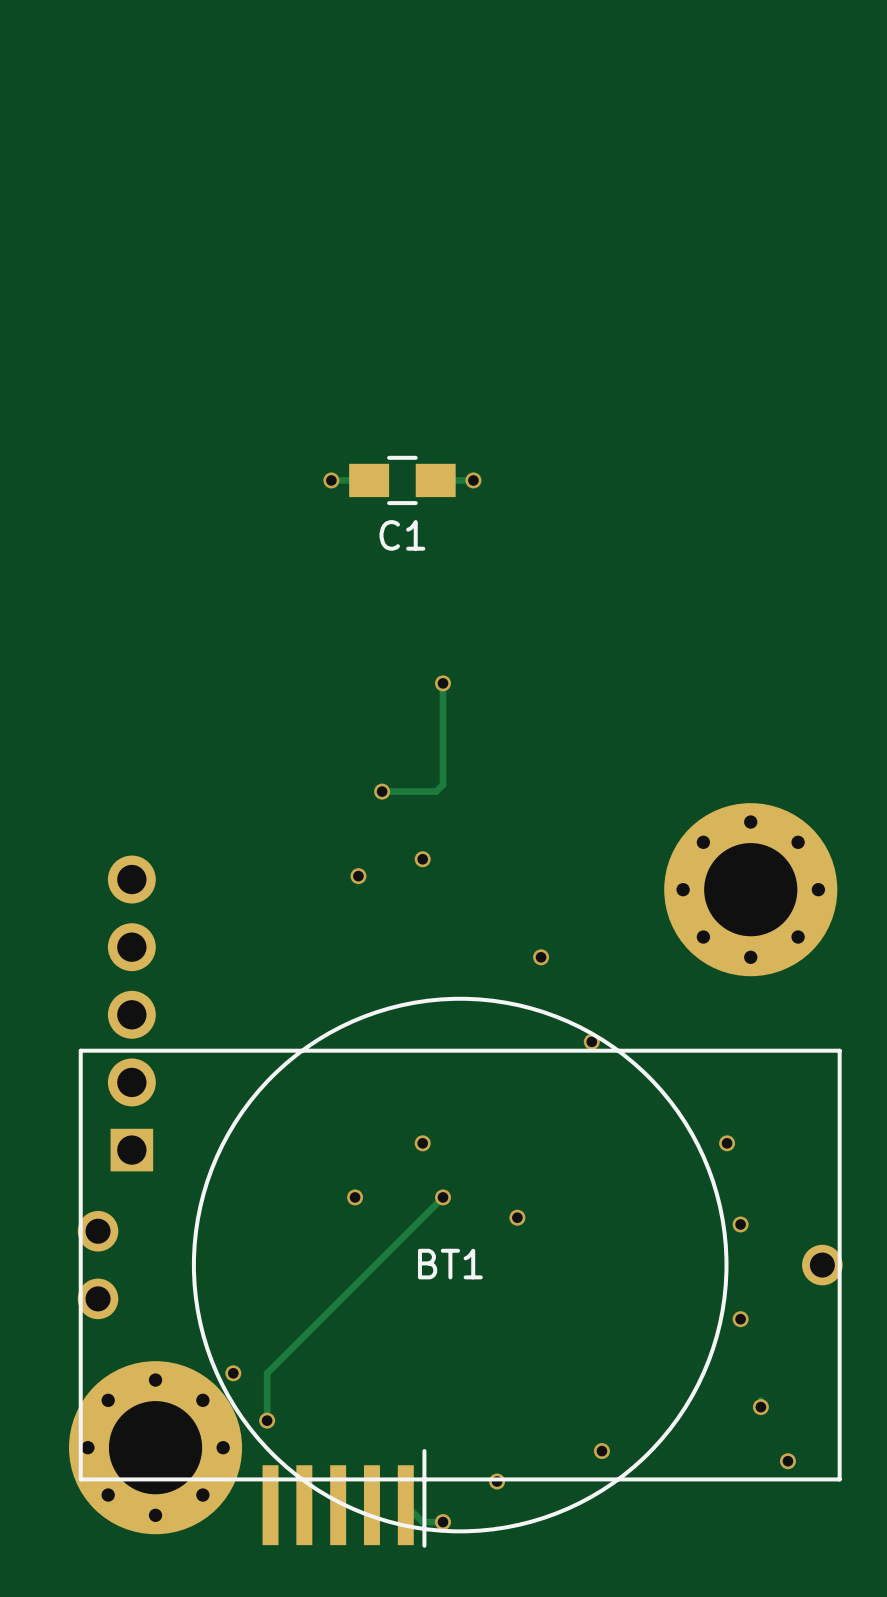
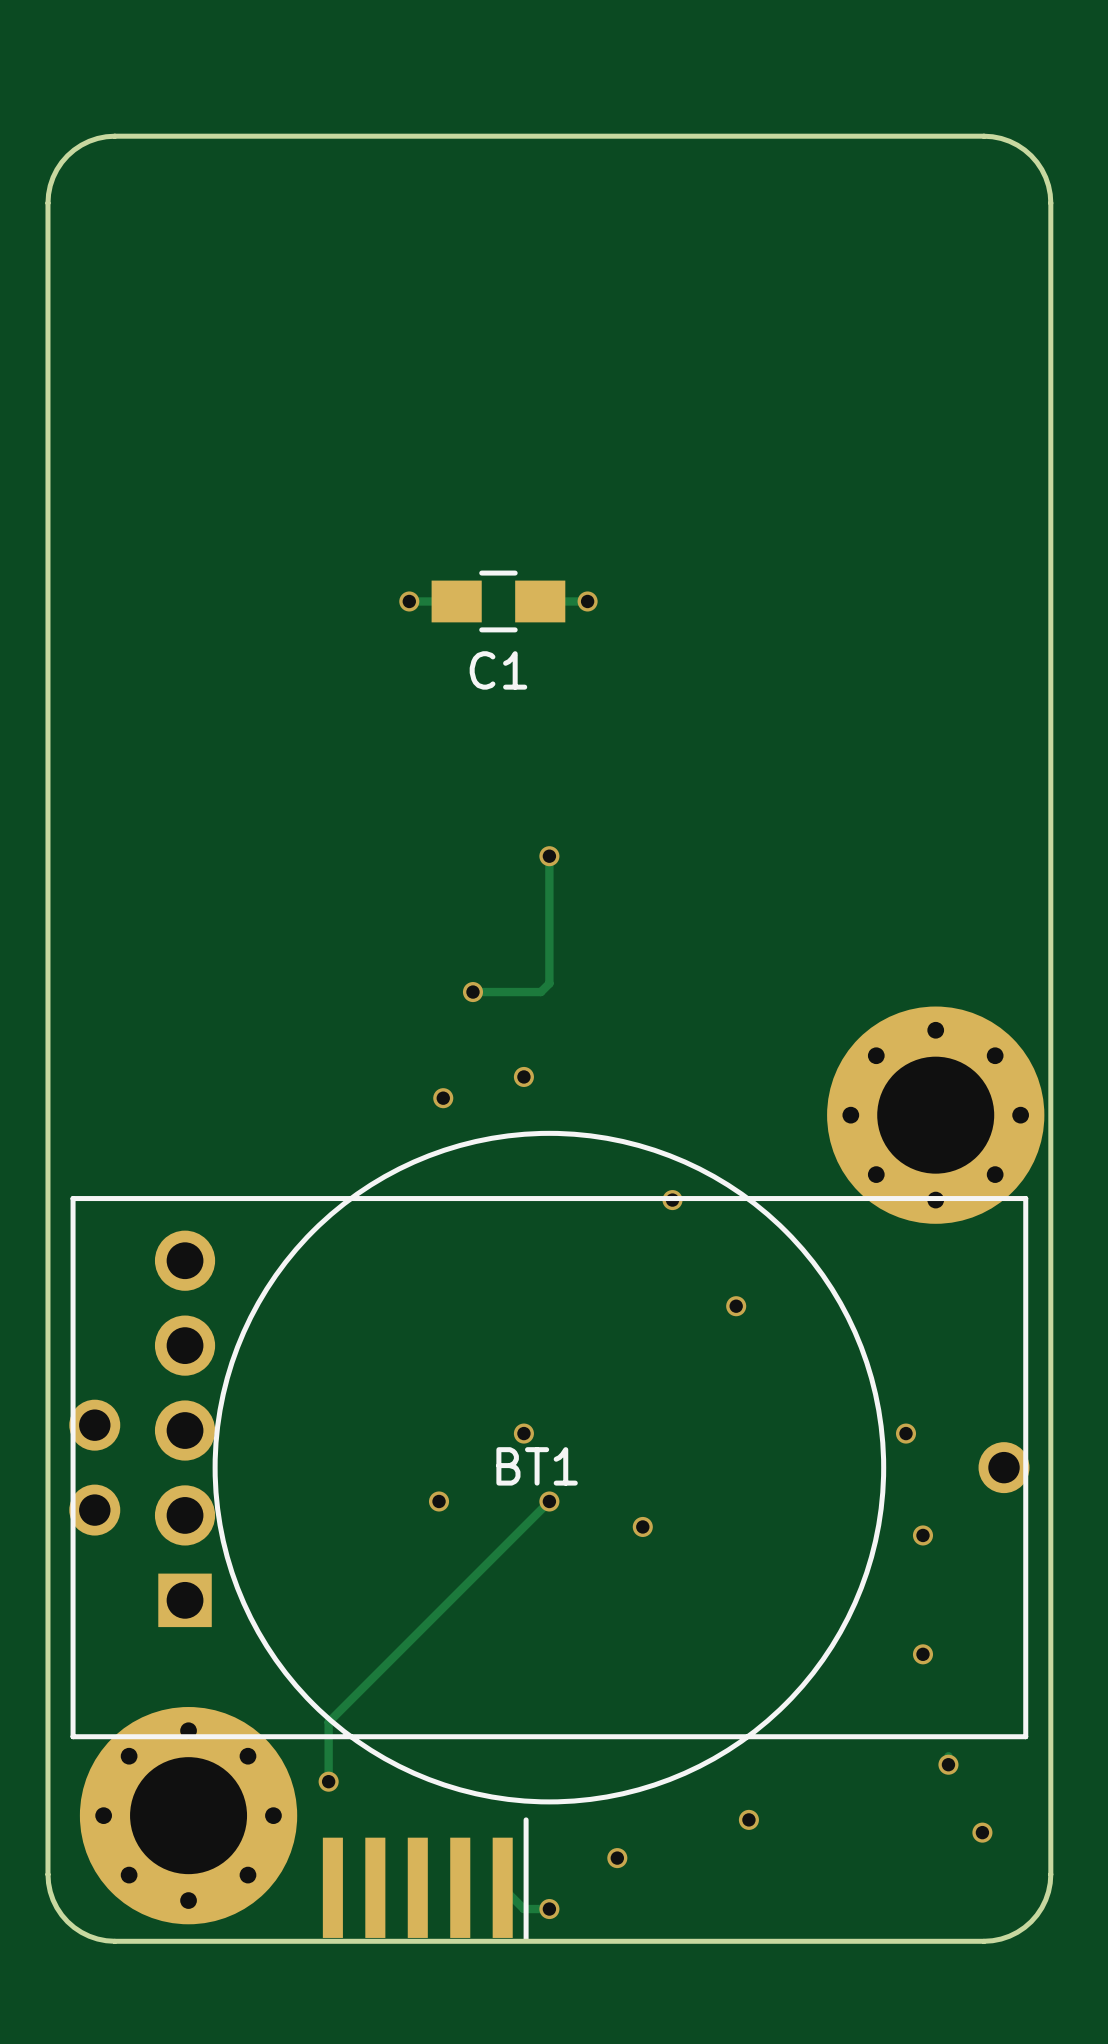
board edge: none -> (983, 136) (114, 136) (97, 138) (81, 145) (67, 155) (56, 169) (50, 185) (47, 203) (47, 1874) (50, 1891) (56, 1907) (67, 1921) (81, 1932) (97, 1939) (114, 1941) (983, 1941) (1001, 1939) (1017, 1932) (1031, 1921) (1041, 1907) (1048, 1891) (1050, 1874) (1050, 203) (1045, 177) (1031, 155) (1009, 141) (983, 136)
part position: (131, 1013) -> (185, 1428)
BT1 position: (460, 1265) -> (549, 1467)
via: (233, 1373) -> none

